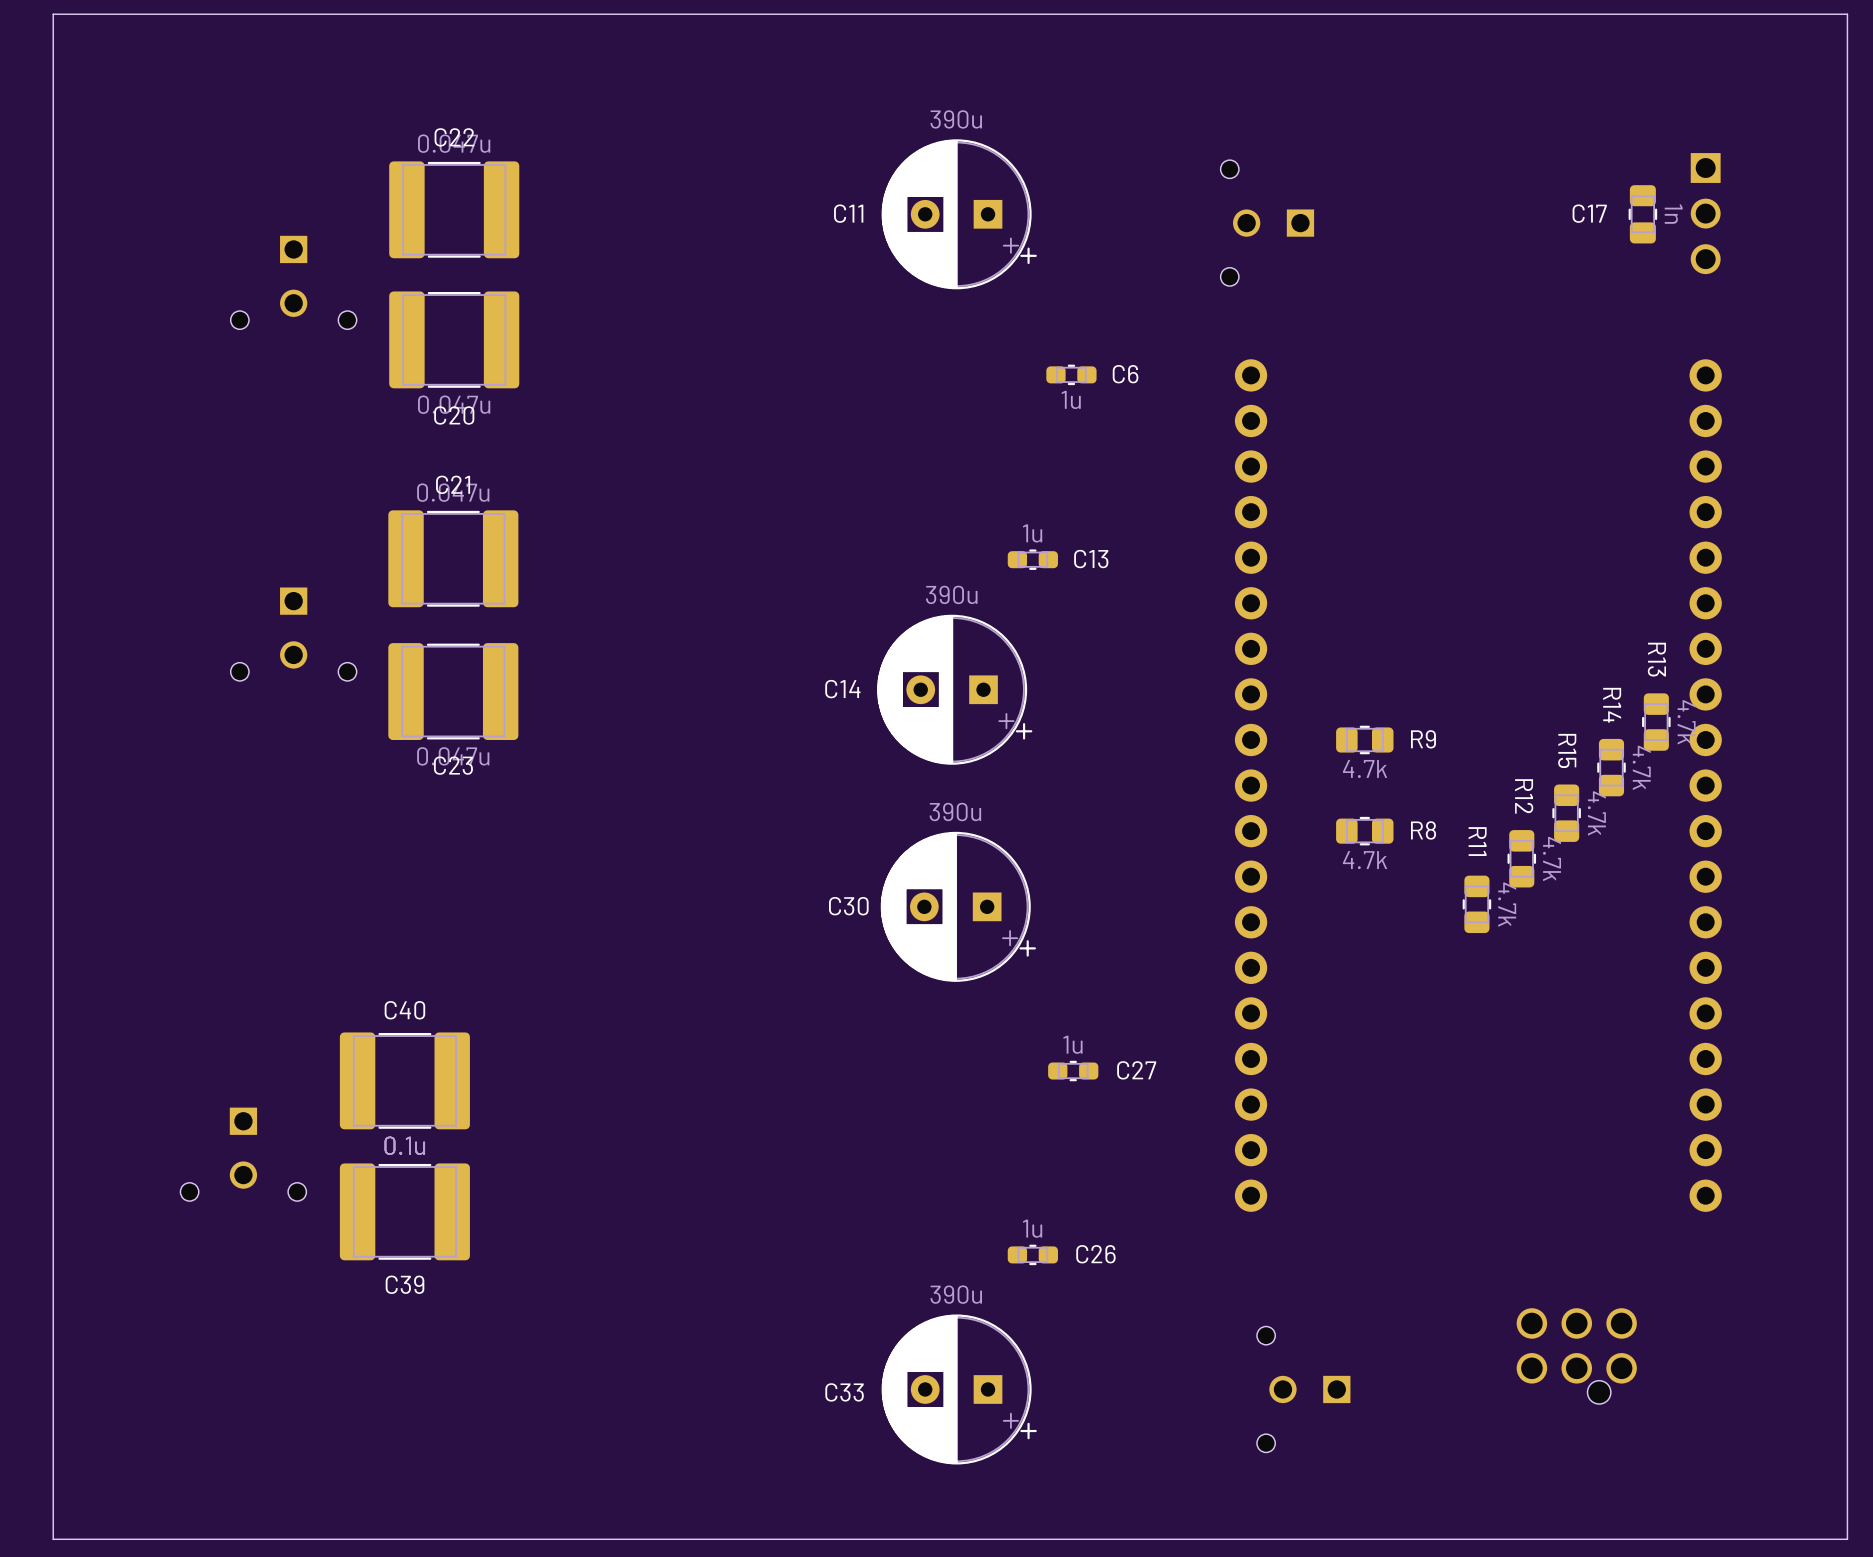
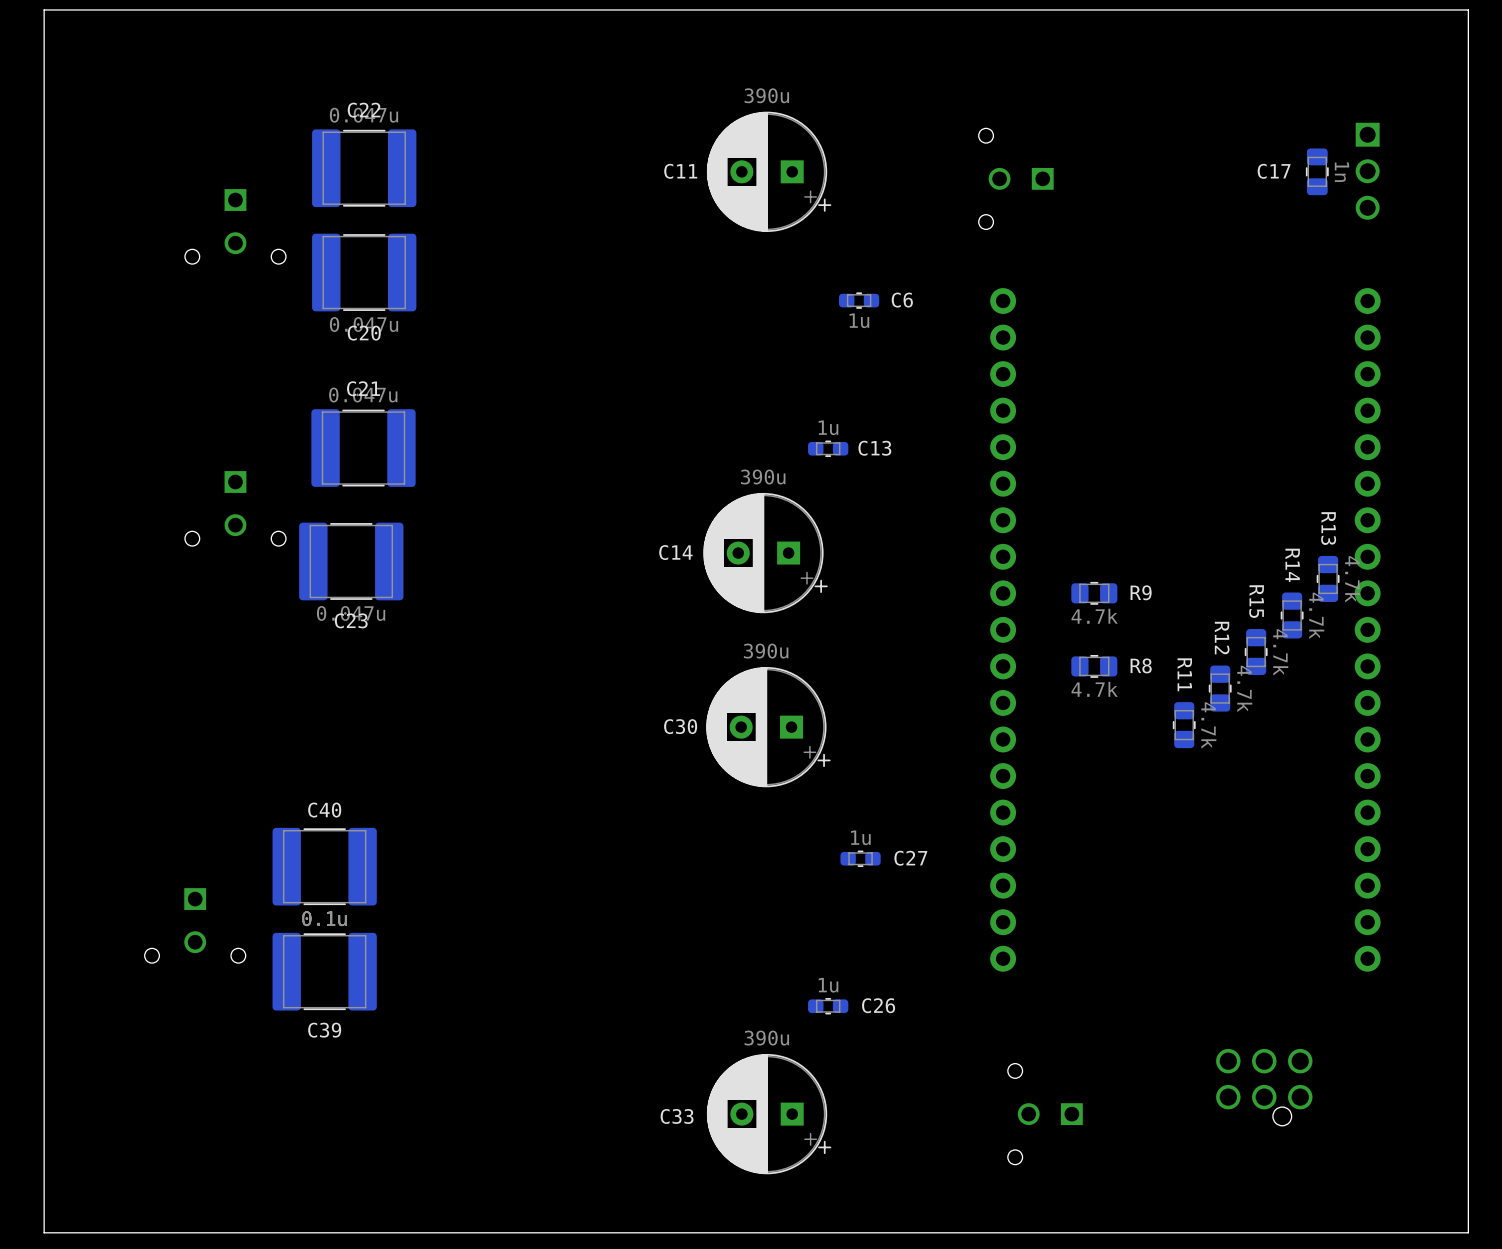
board edge: (1847, 14) (53, 14) (53, 1539) (1847, 1539) (1847, 14) -> (1468, 9) (1468, 1232) (44, 1232) (44, 9) (1468, 9)
C23 position: (453, 691) -> (351, 561)

